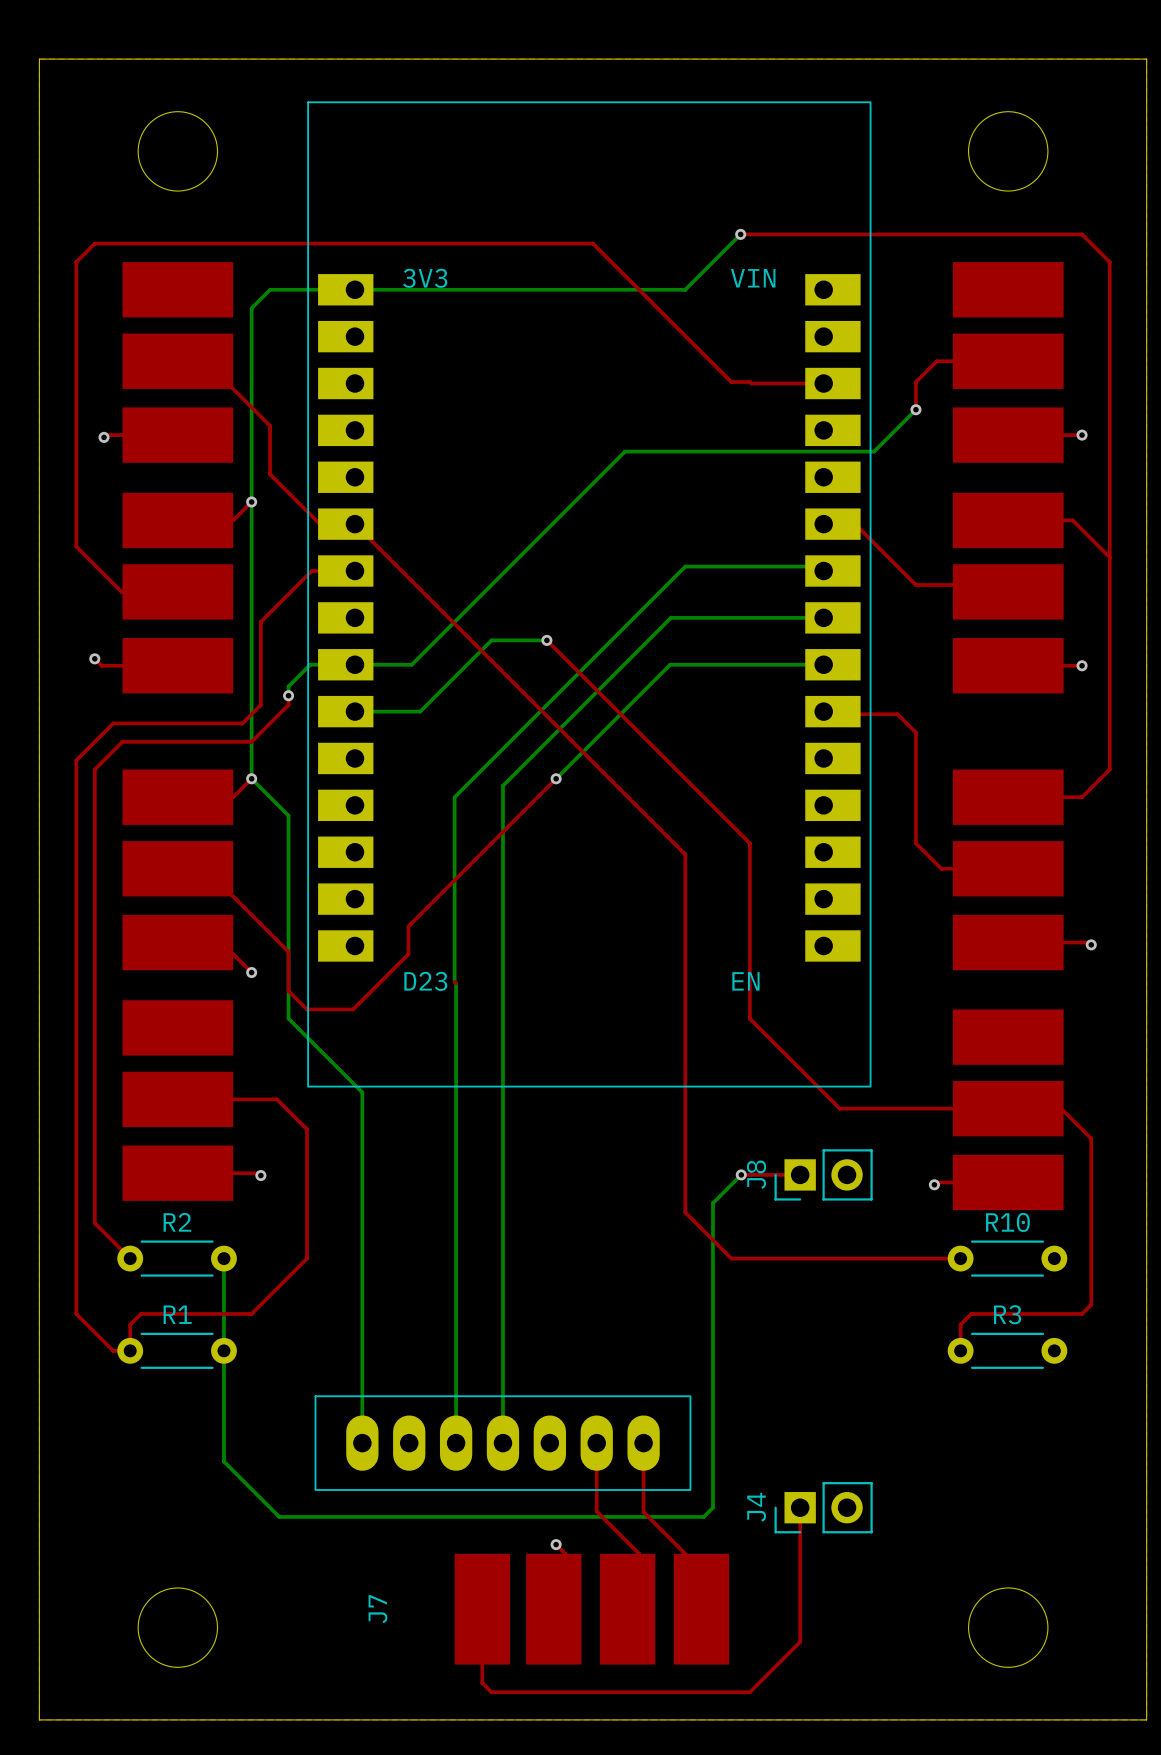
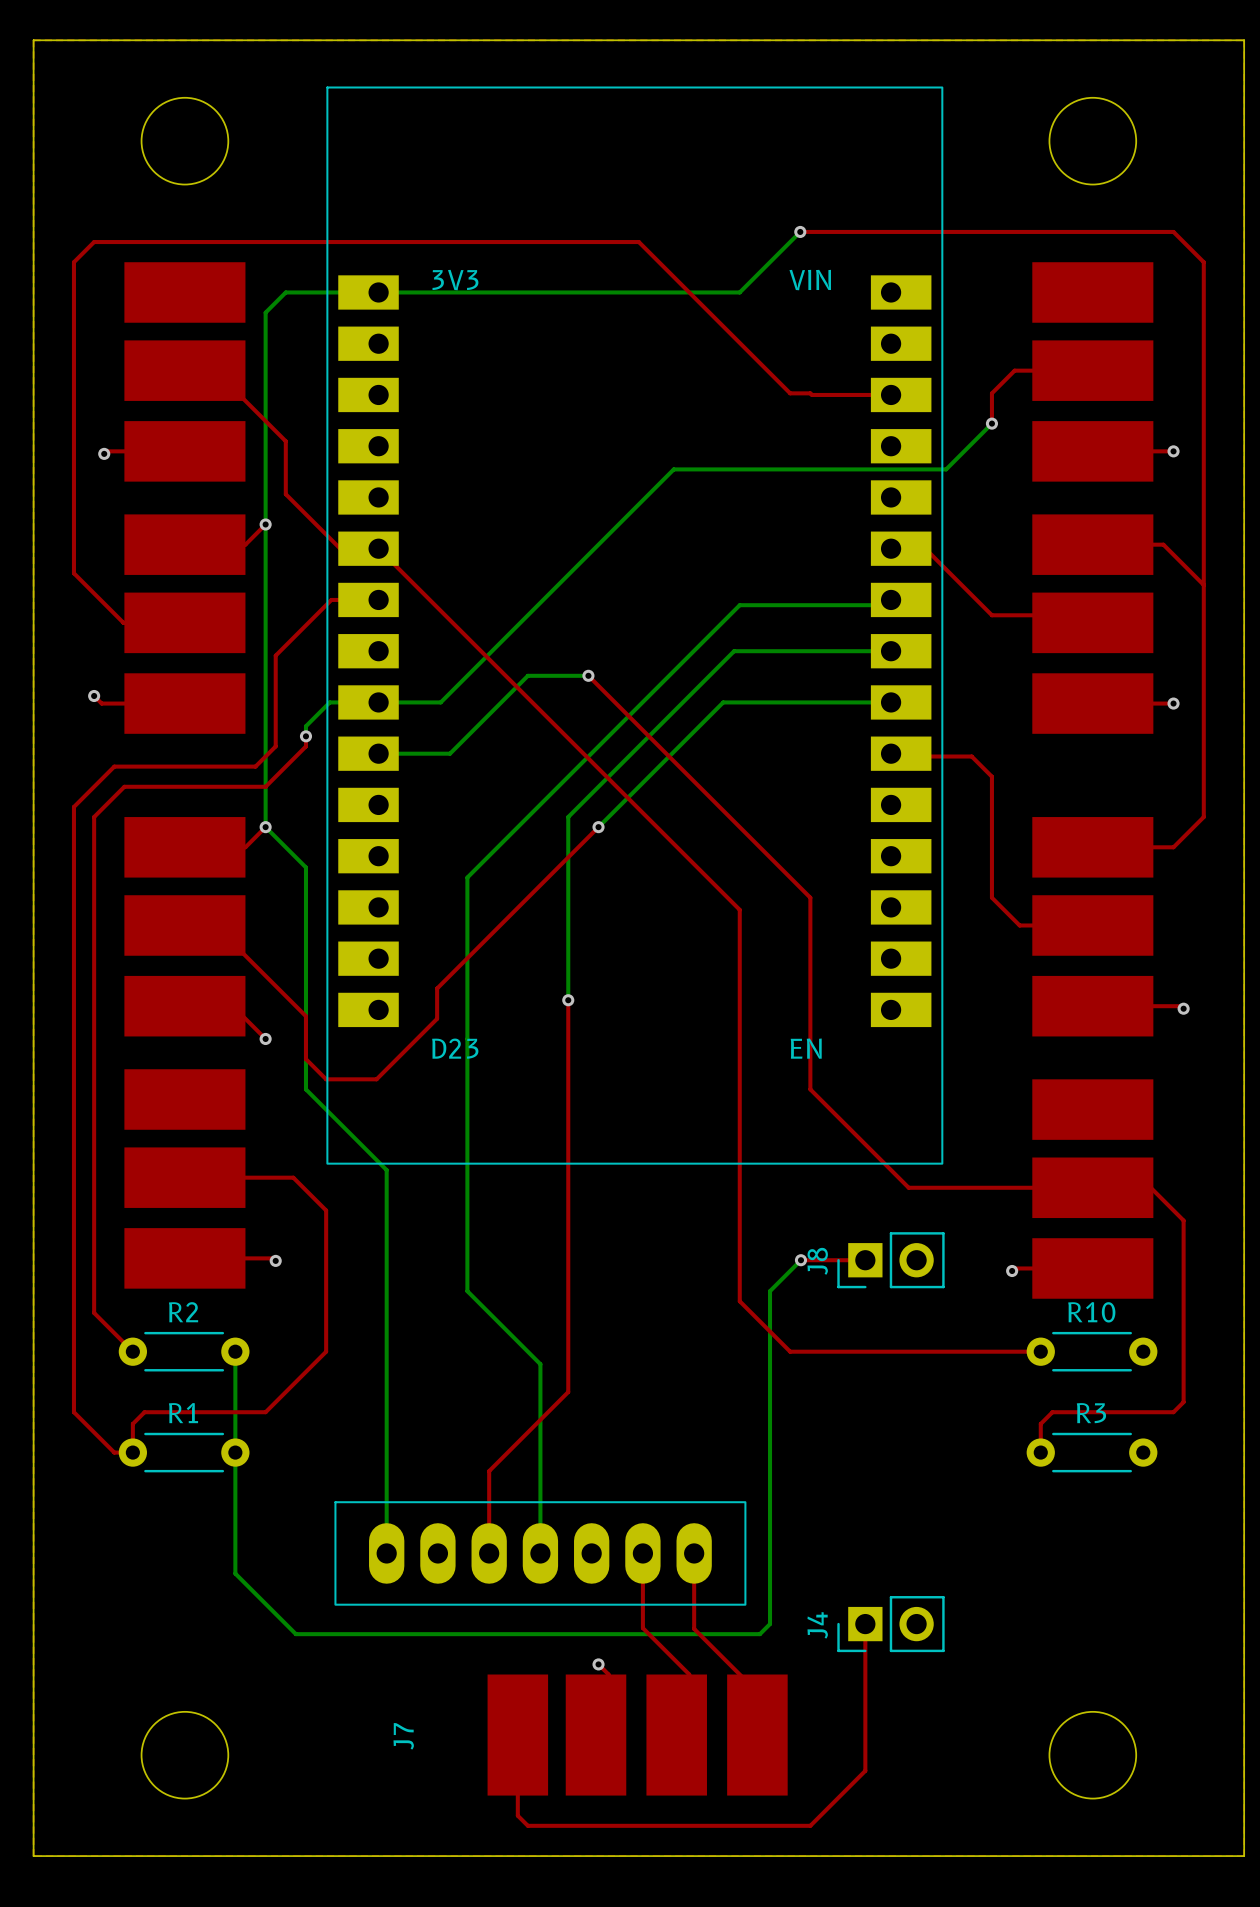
bottom track: (823, 571) (819, 566) (685, 566) (454, 797) (456, 1443) -> none
bottom track: (680, 617) (670, 617) (502, 785) (502, 1270) -> (885, 605) (739, 605) (467, 877) (467, 1291) (540, 1364)
bottom track: none -> (734, 651) (568, 817) (568, 1000)
top track: none -> (568, 1000) (568, 1392) (489, 1471) (489, 1553)
via: none -> (568, 1000)
top track: (454, 981) (456, 983) -> none

